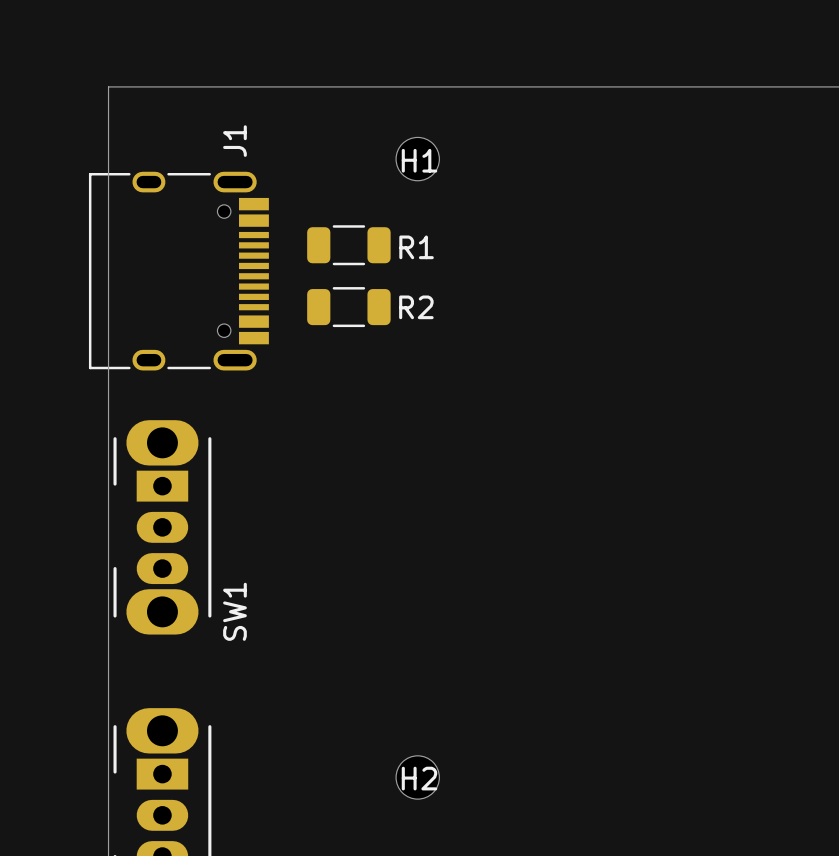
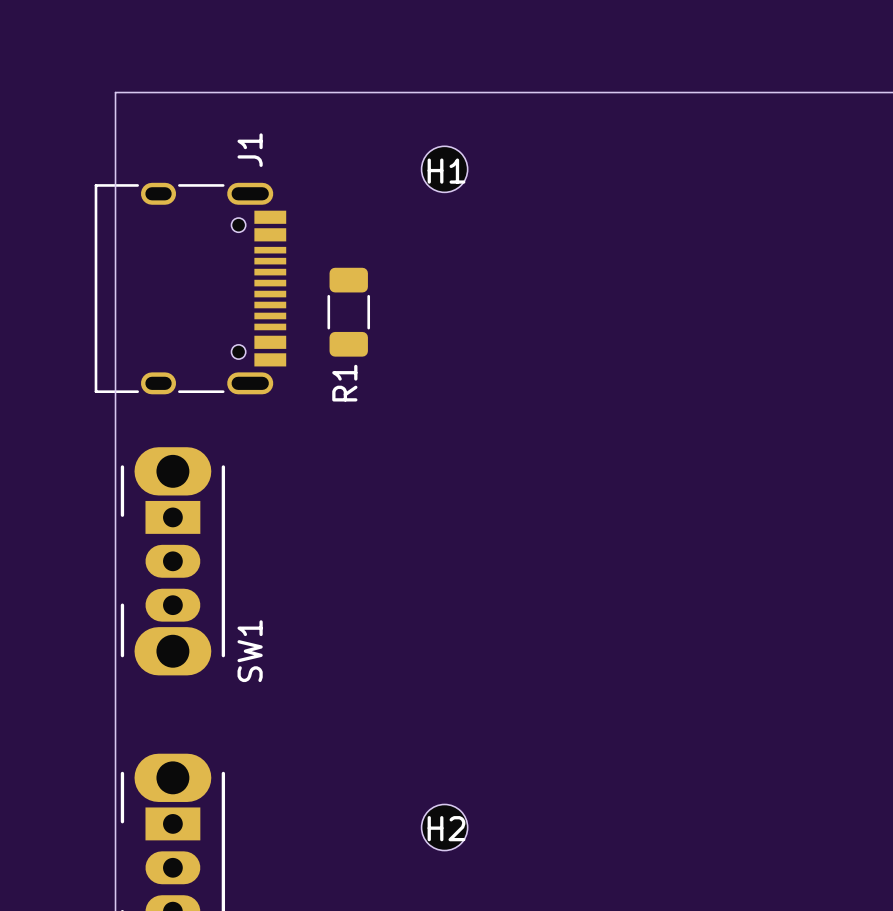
R1 rotation: 0° (348, 245) -> 90° clockwise (348, 312)
R1 position: (348, 245) -> (348, 312)
R2: (348, 307) -> none

